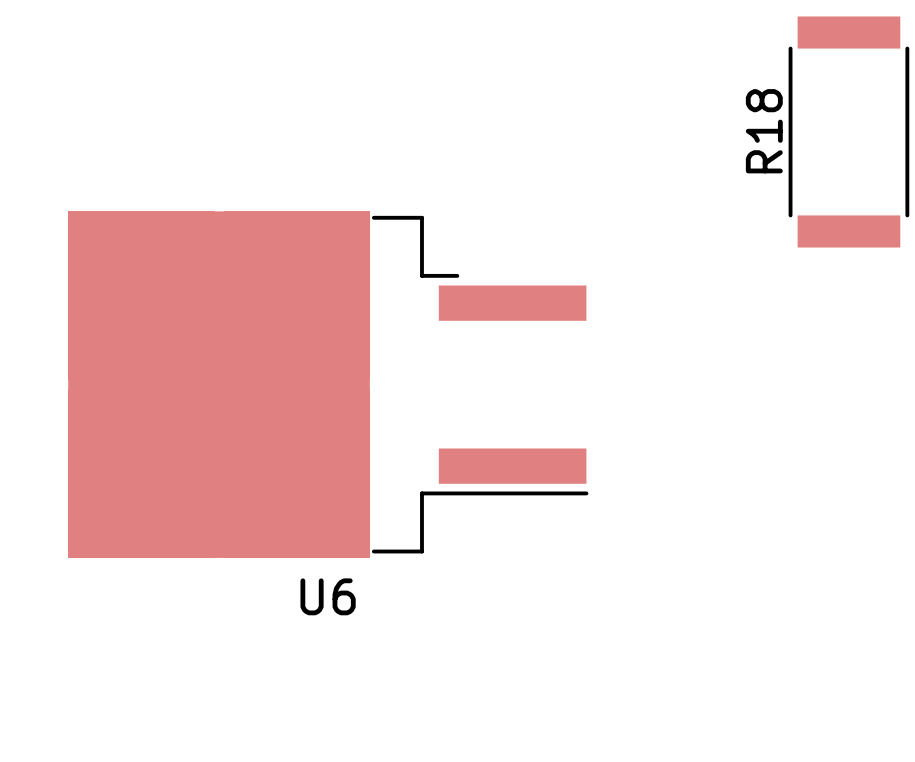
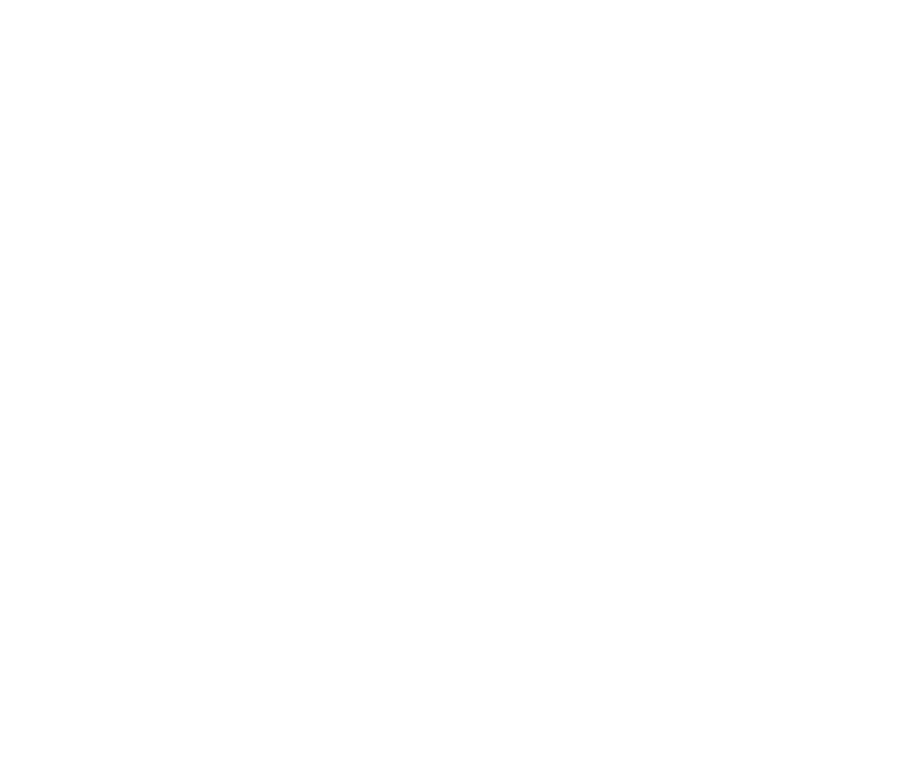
R18: (848, 131) -> none
U6: (328, 384) -> none

